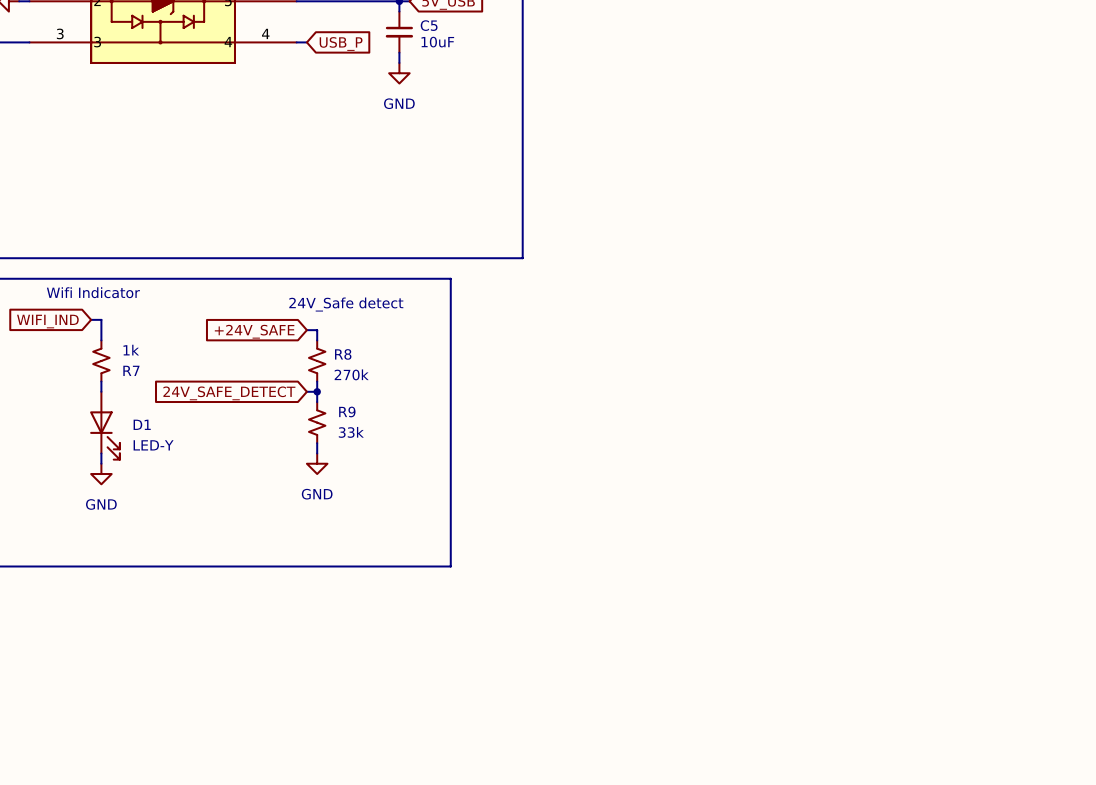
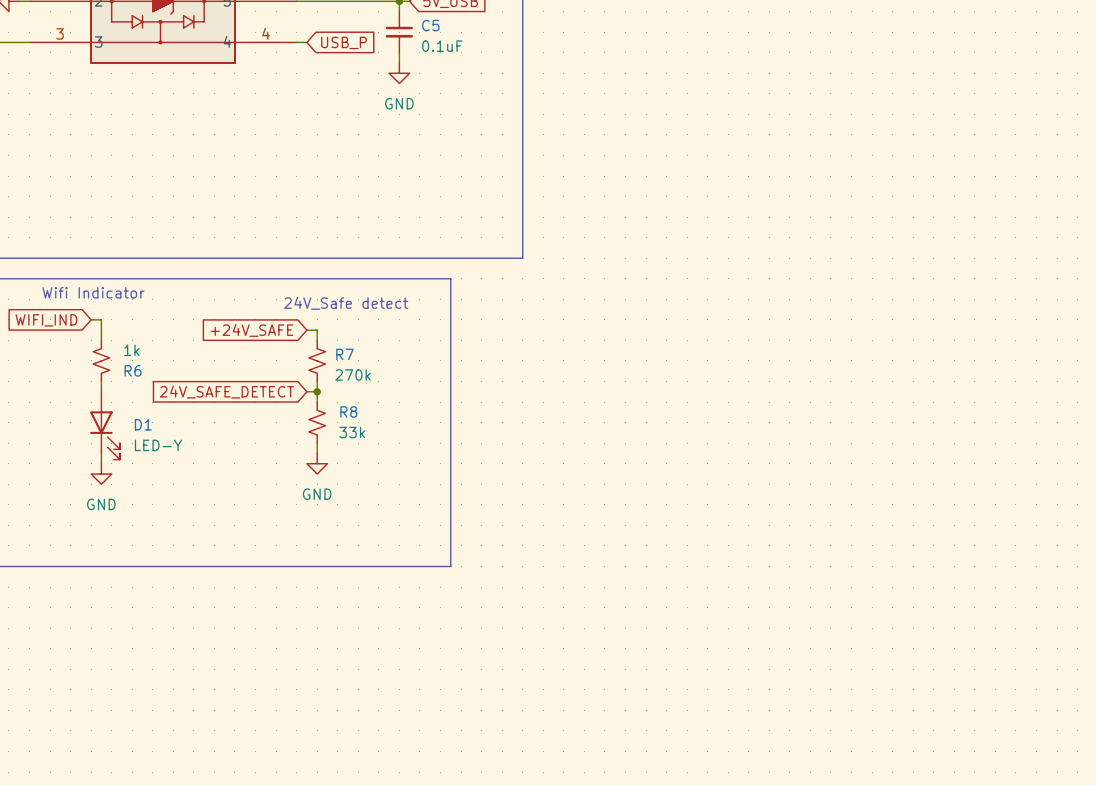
C5 value: 10uF (437, 42) -> 0.1uF (442, 46)
R8 name: R8 (343, 354) -> R7 (344, 354)
R7 name: R7 (131, 370) -> R6 (133, 370)
R9 name: R9 (347, 411) -> R8 (348, 411)

